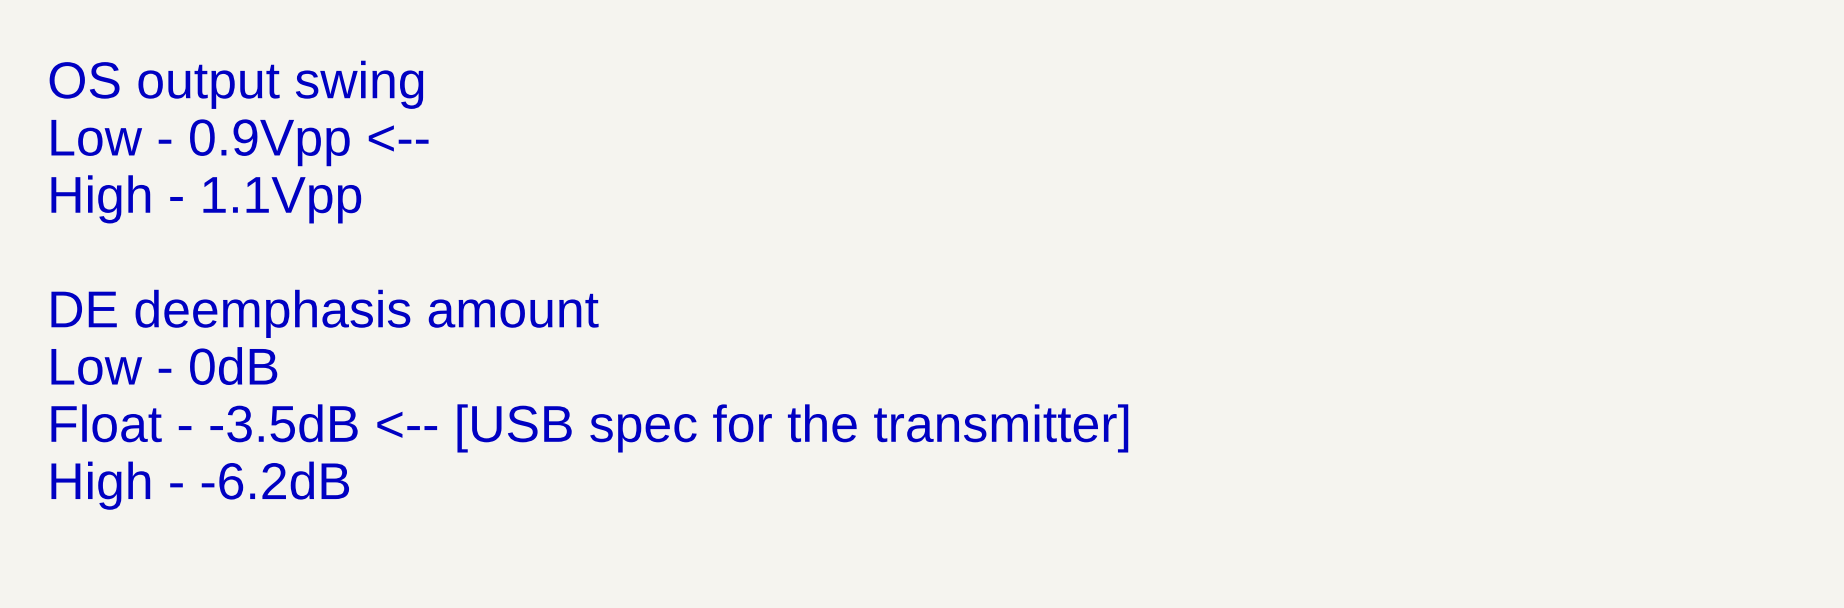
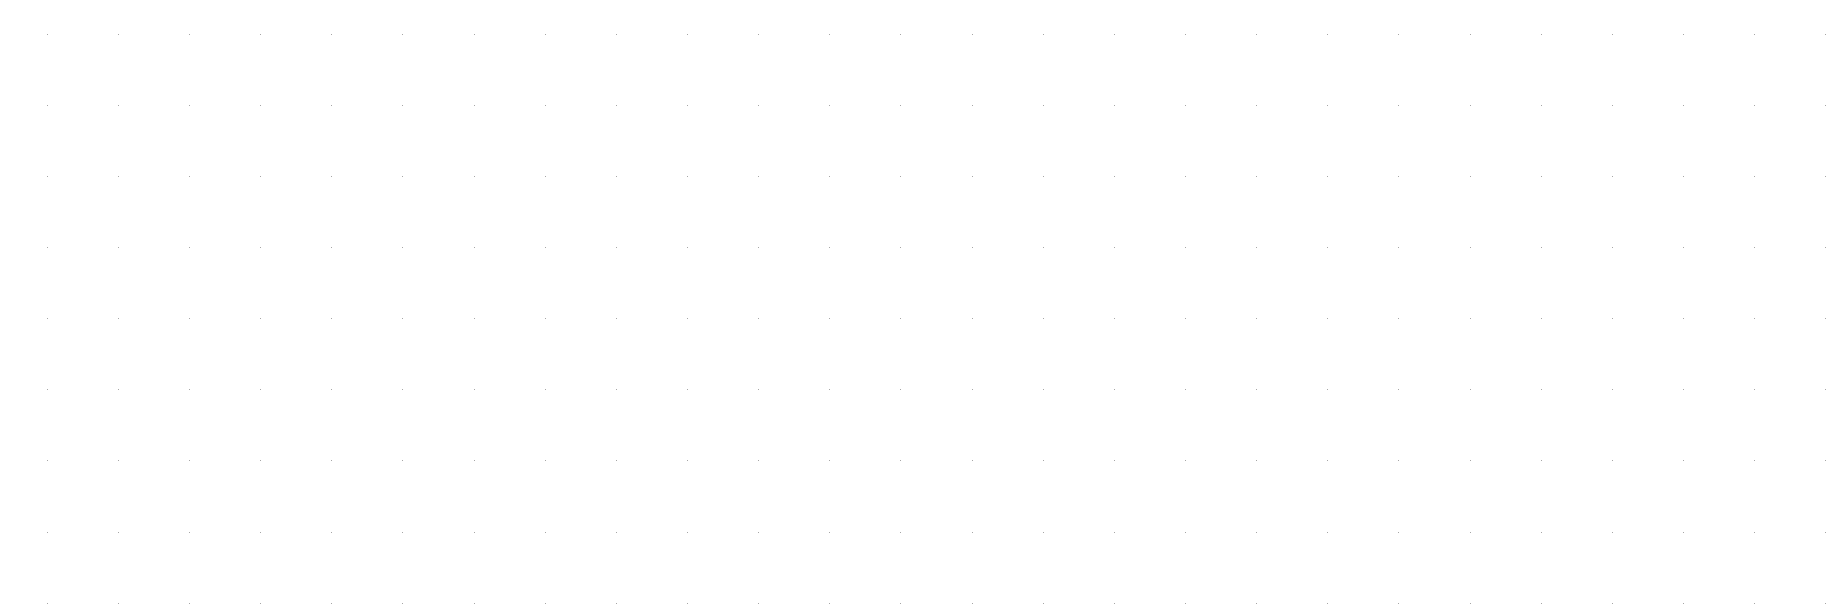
text: OS output swing (236, 84) -> none
text: Low - 0.9Vpp <-- (240, 142) -> none
text: High - 1.1Vpp (206, 199) -> none
text: DE deemphasis amount (325, 313) -> none
text: Low - 0dB (164, 366) -> none
text: Float - -3.5dB <-- [USB spec for the transmitter] (589, 428) -> none
text: High - -6.2dB (200, 485) -> none

